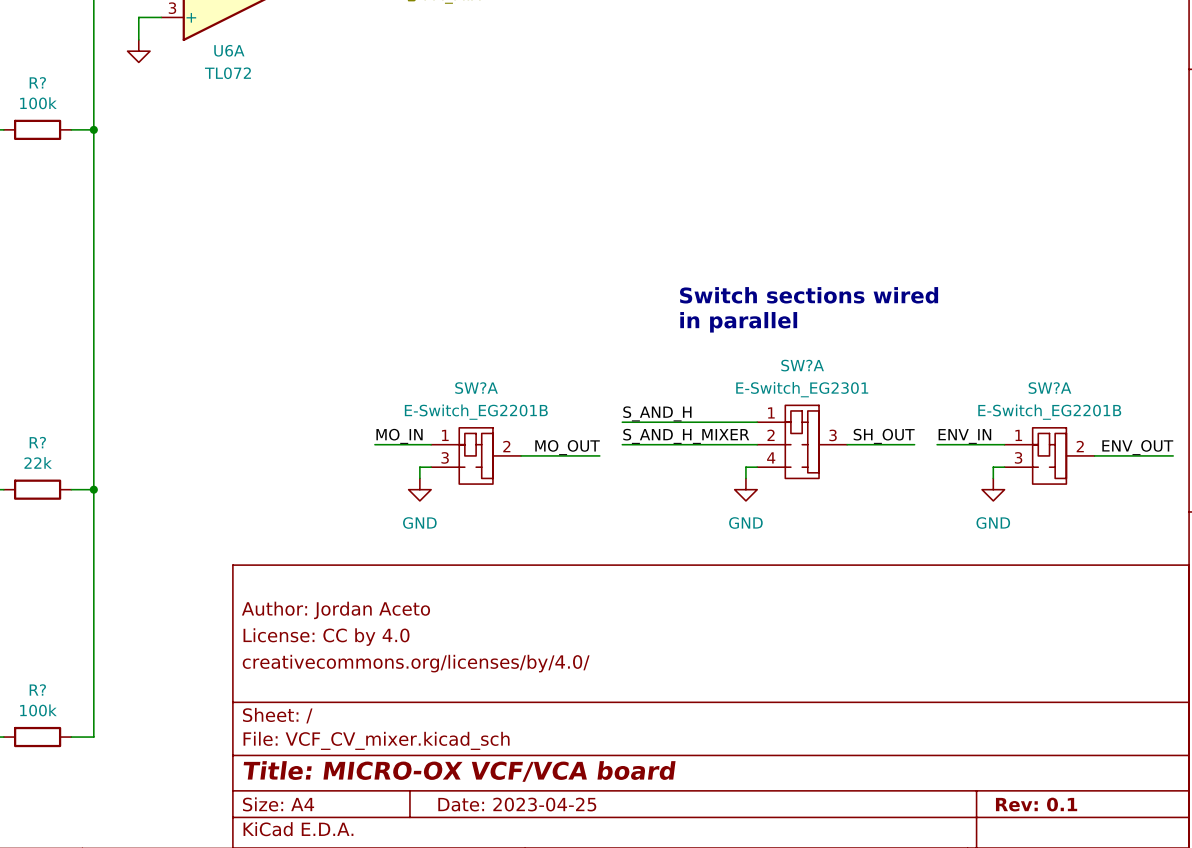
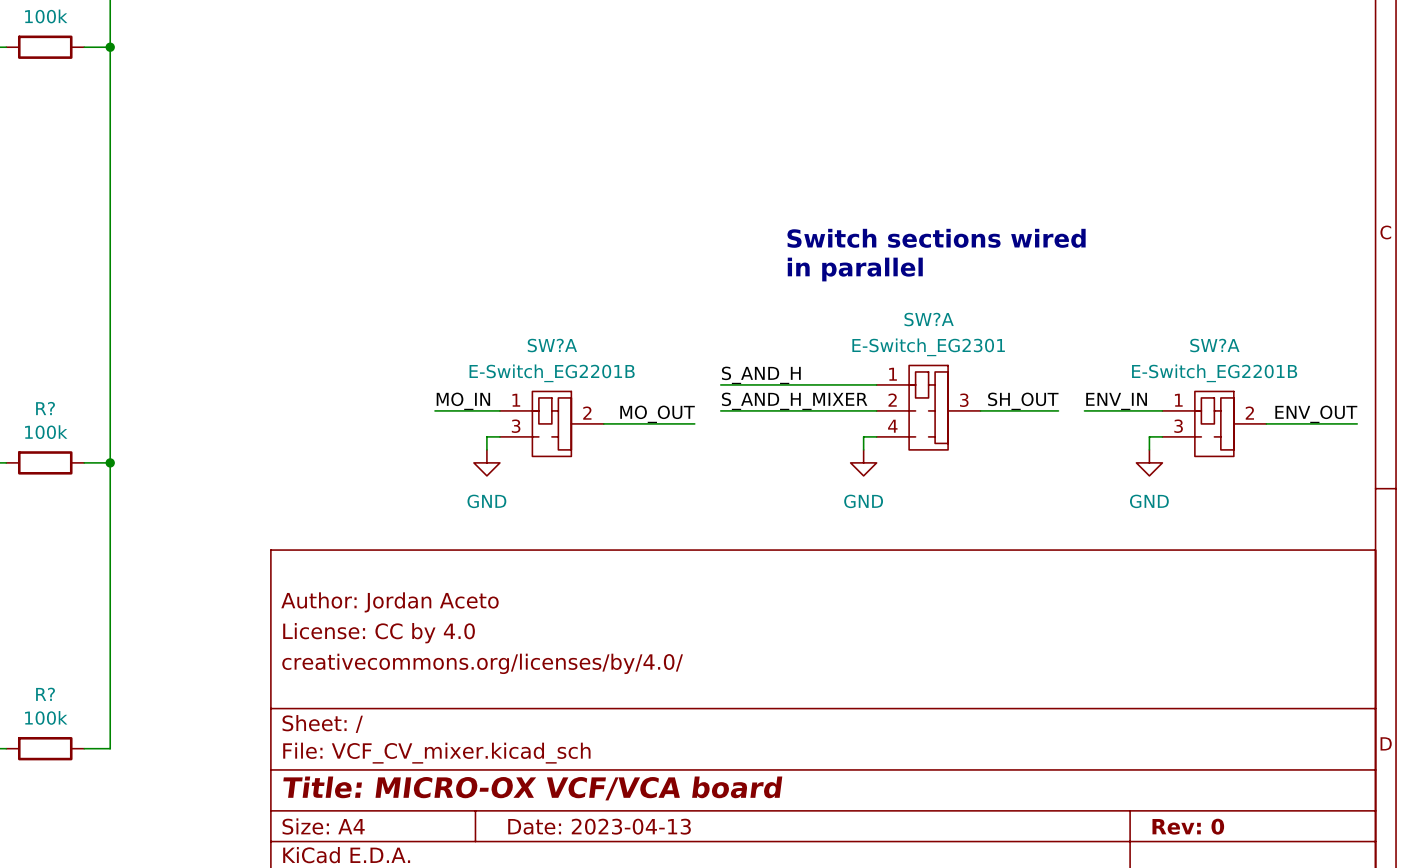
R? value: 22k (38, 462) -> 100k (46, 432)
title block: Date: 2023-04-25 (517, 804) -> Date: 2023-04-13 (599, 826)
title block: Rev: 0.1 (1036, 804) -> Rev: 0 (1188, 826)

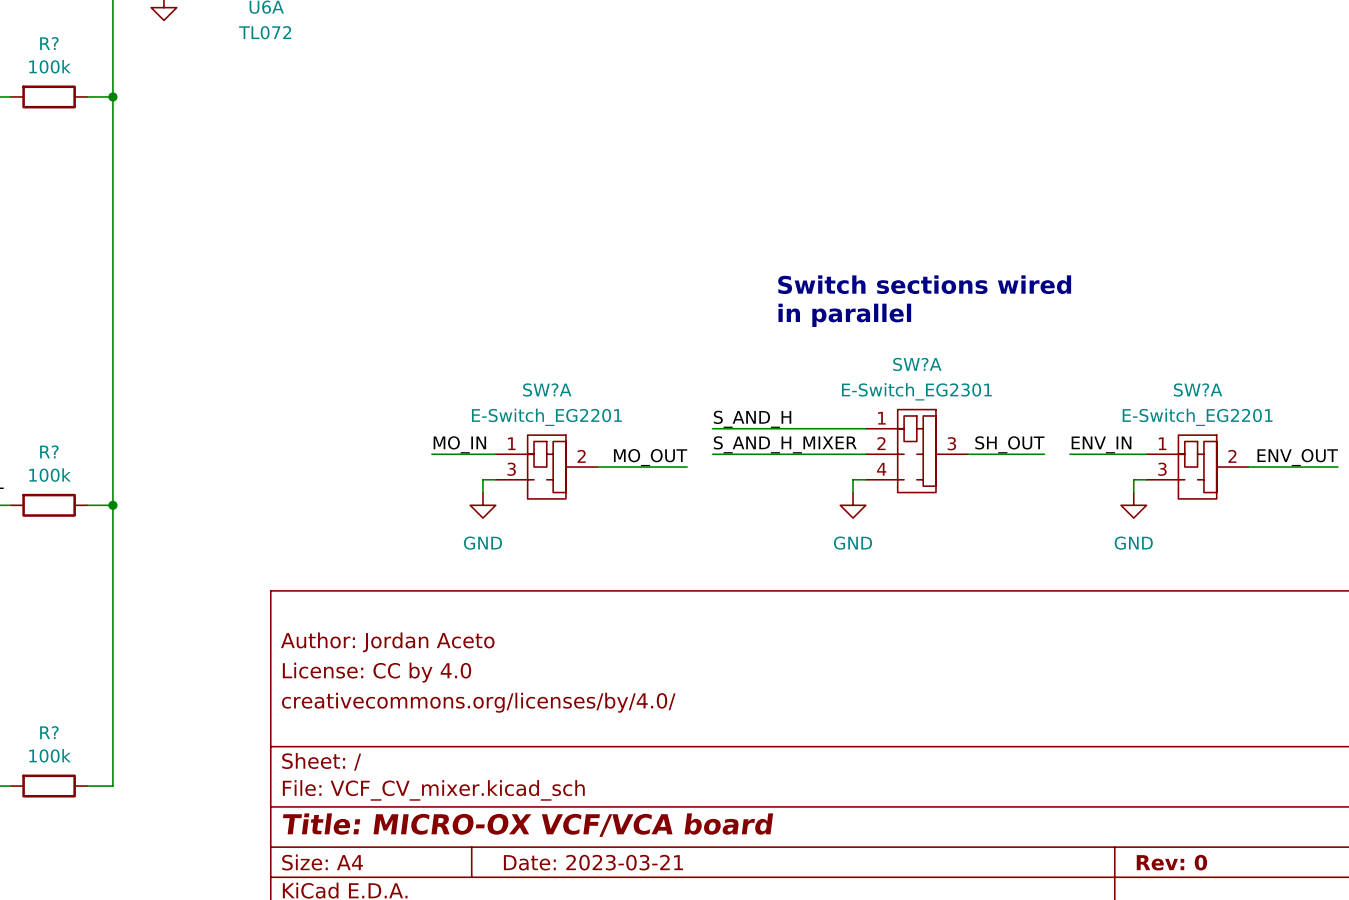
SW?A value: E-Switch_EG2201B (552, 373) -> E-Switch_EG2201 (546, 417)
SW?A value: E-Switch_EG2201B (1214, 373) -> E-Switch_EG2201 (1197, 417)
title block: Date: 2023-04-13 (599, 826) -> Date: 2023-03-21 (593, 862)

